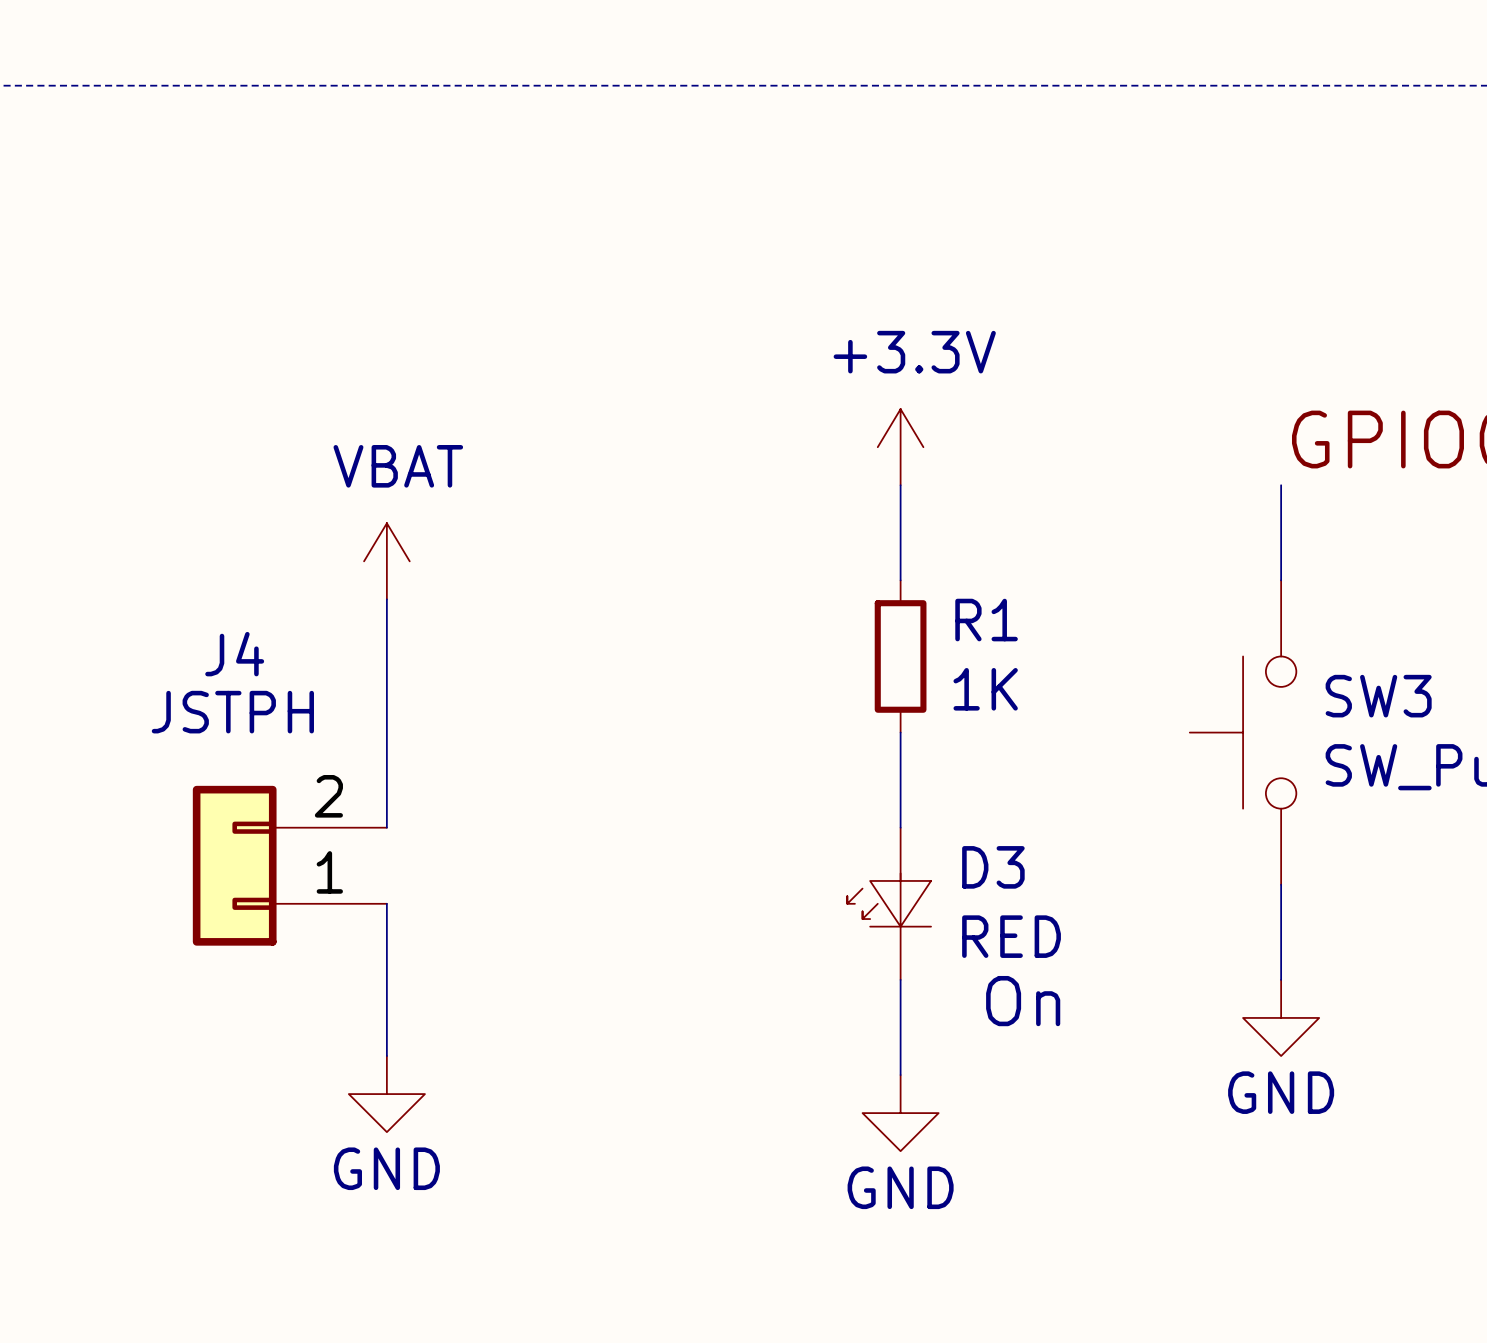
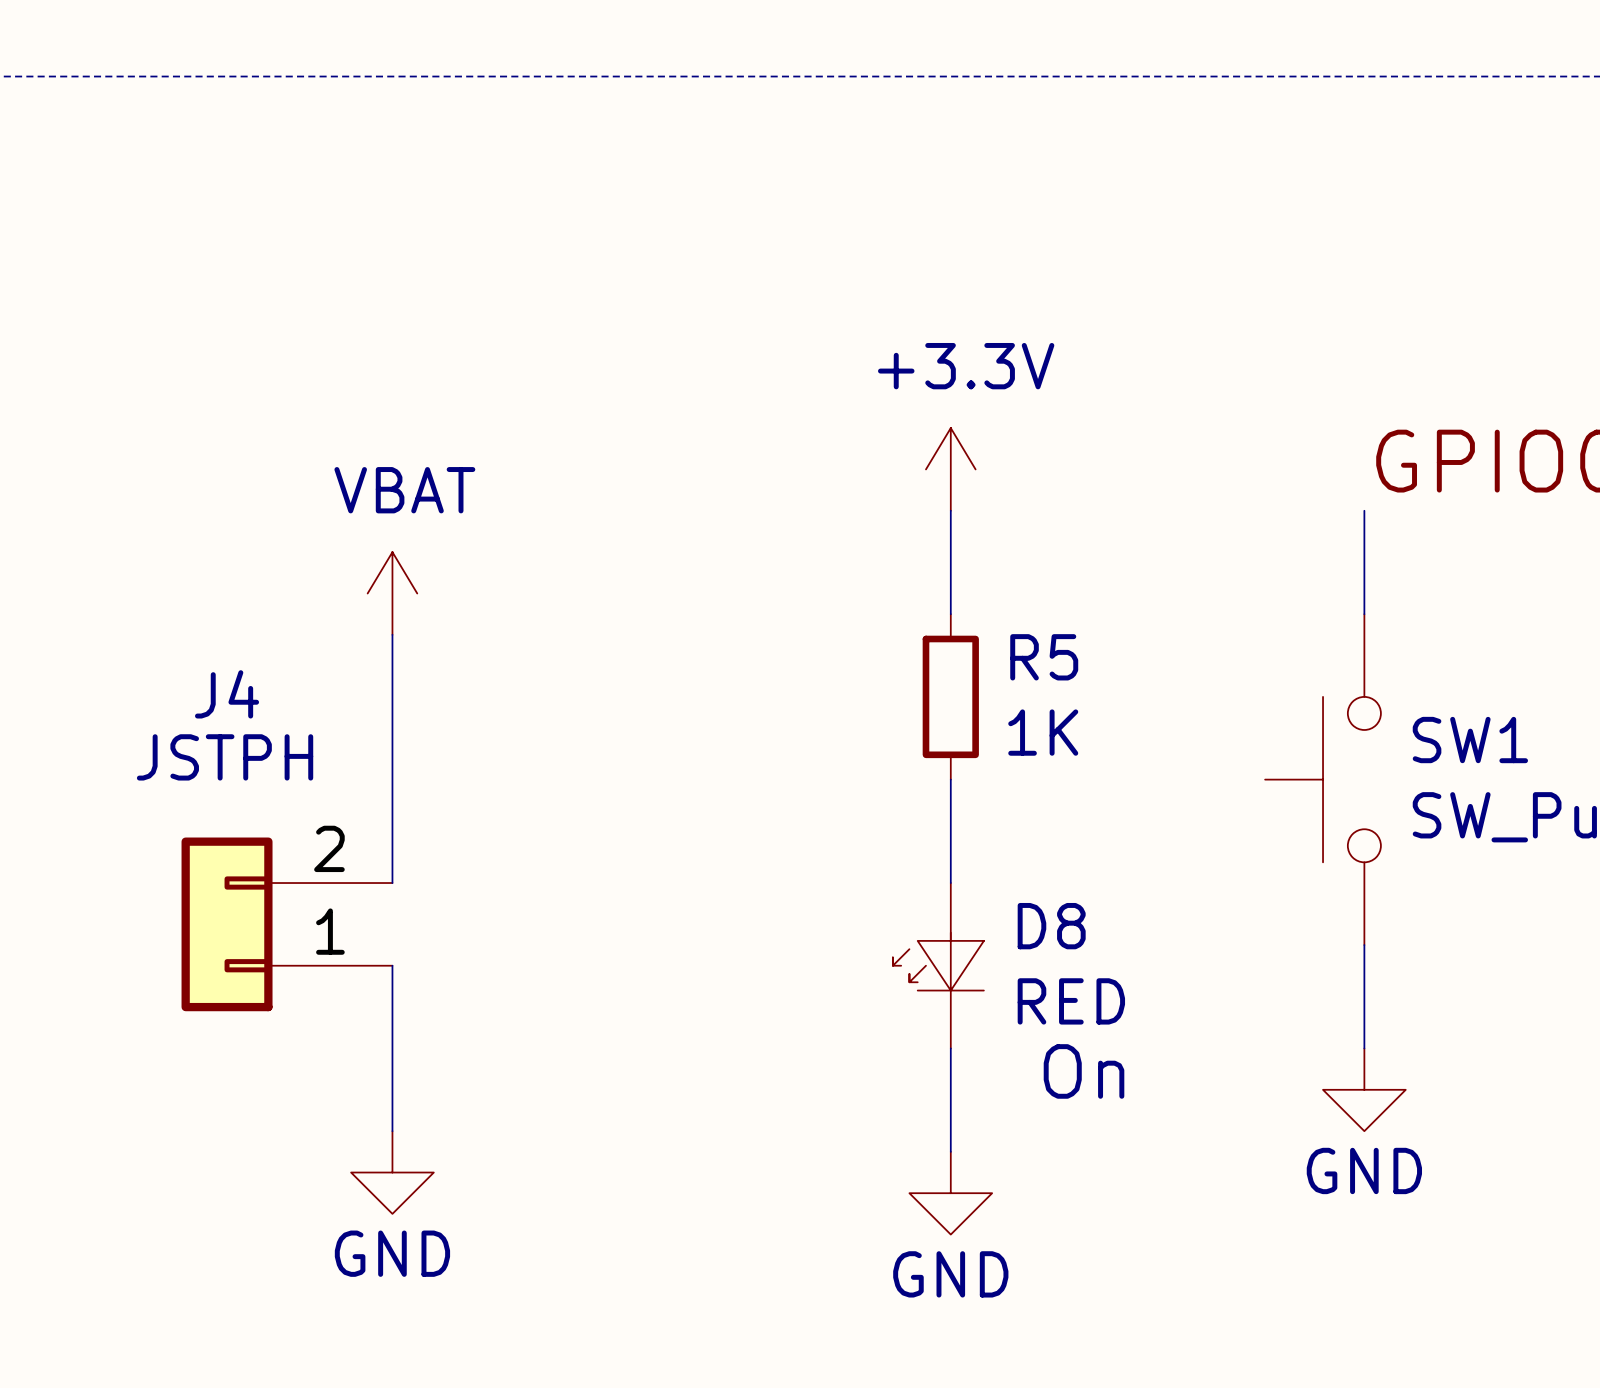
R1 name: R1 (986, 620) -> R5 (1044, 657)
SW3 name: SW3 (1378, 696) -> SW1 (1470, 740)
D3 name: D3 (993, 867) -> D8 (1051, 926)

